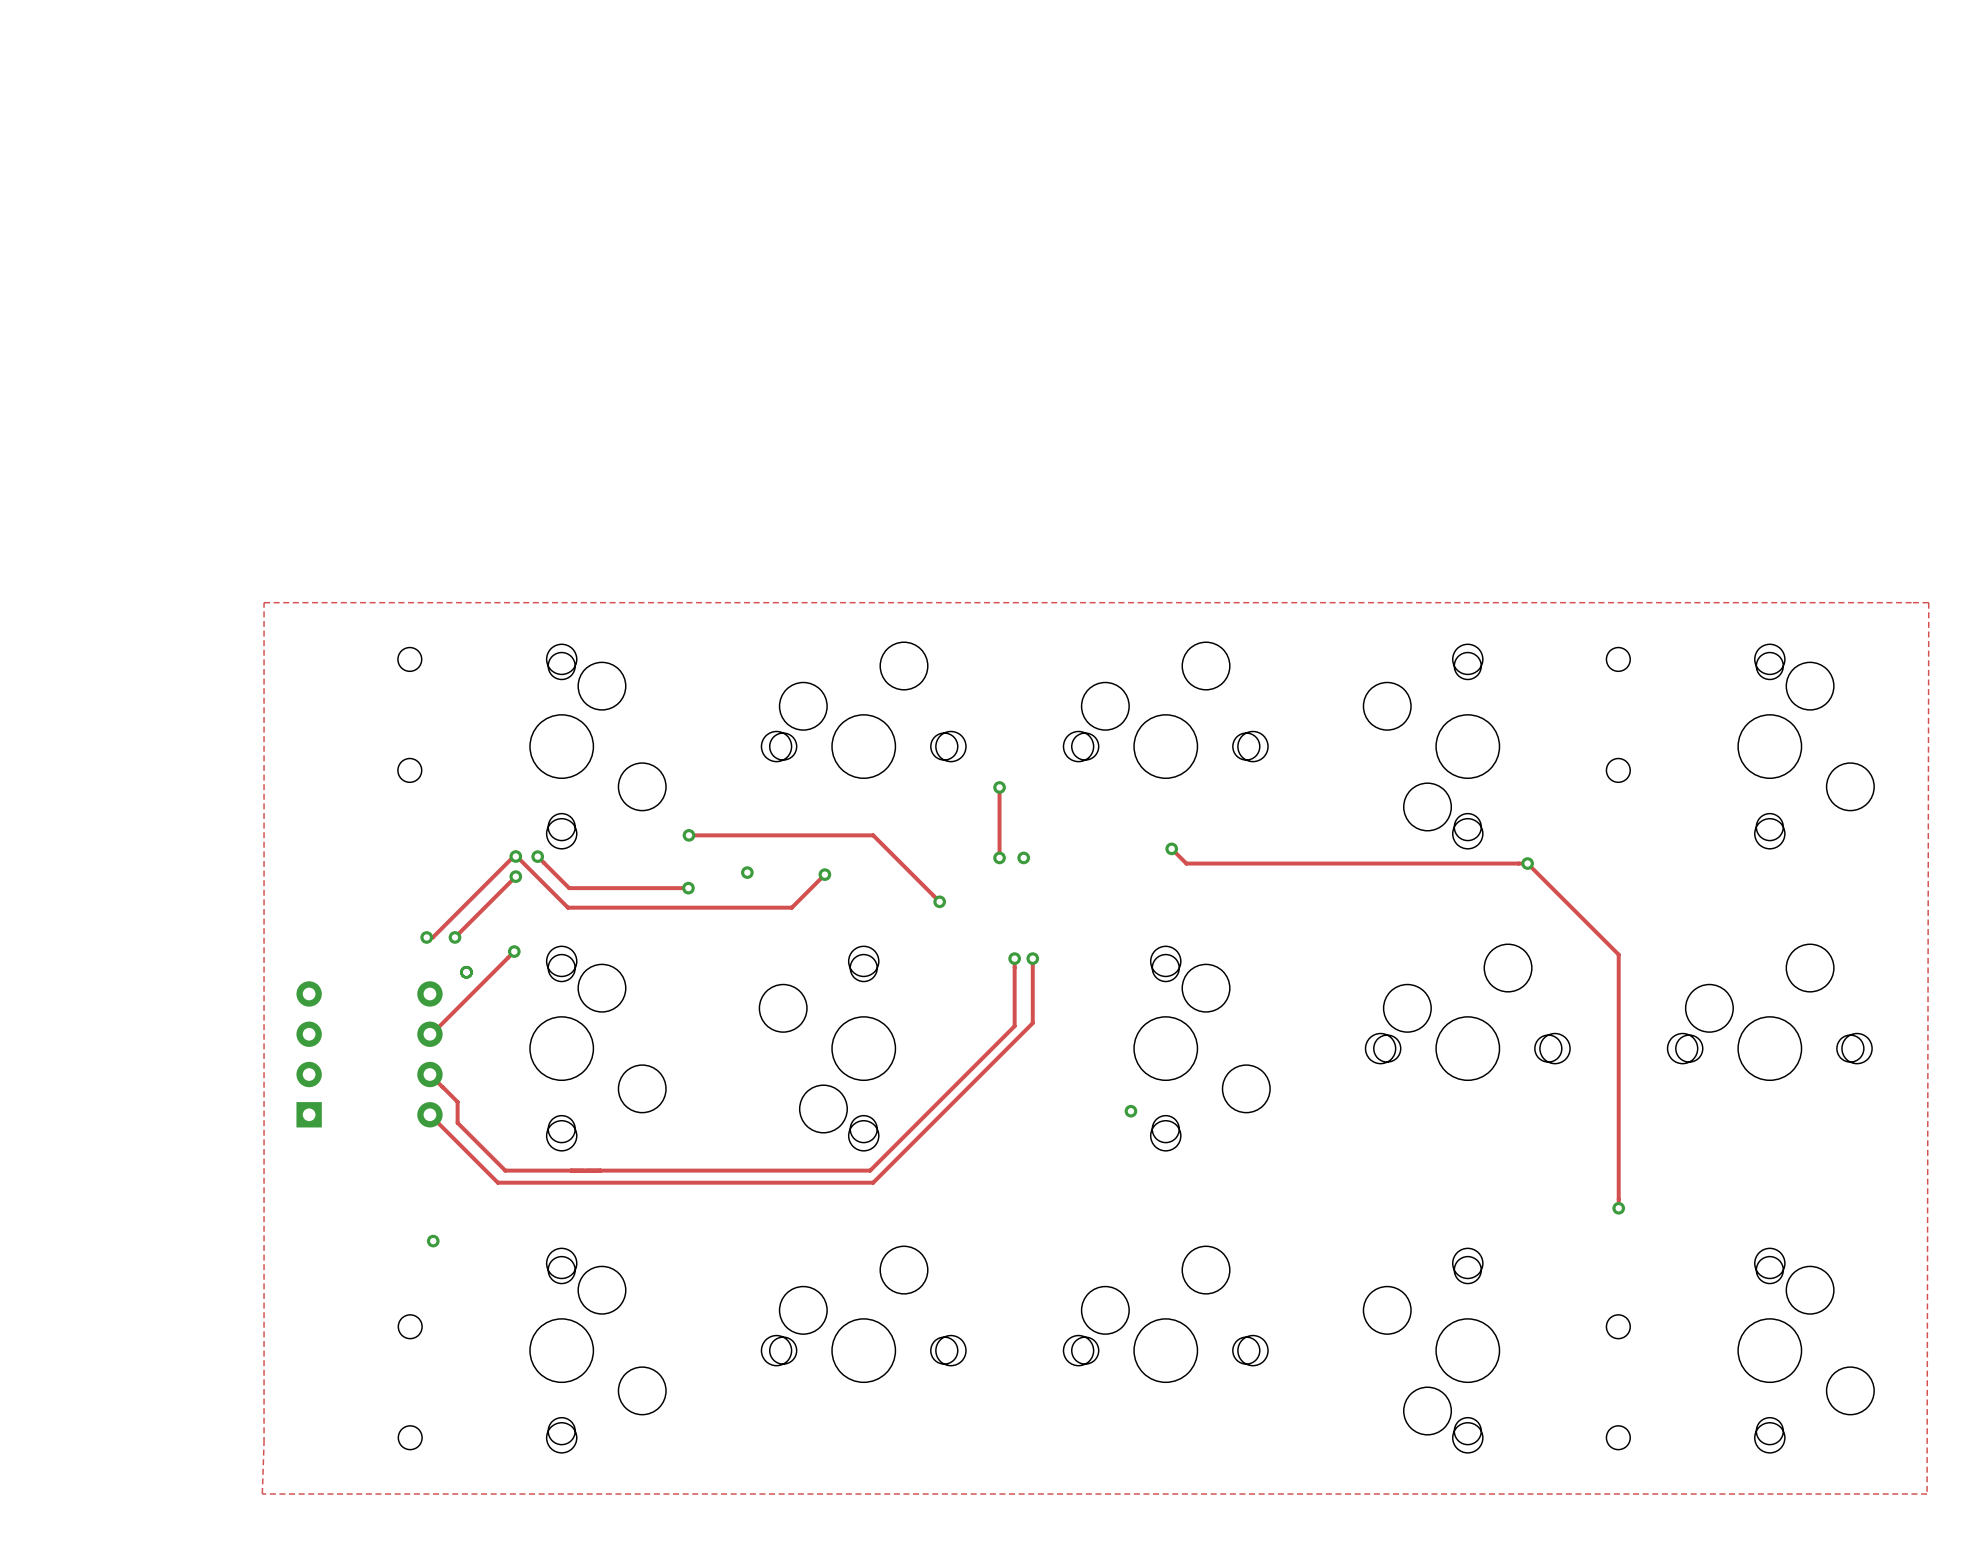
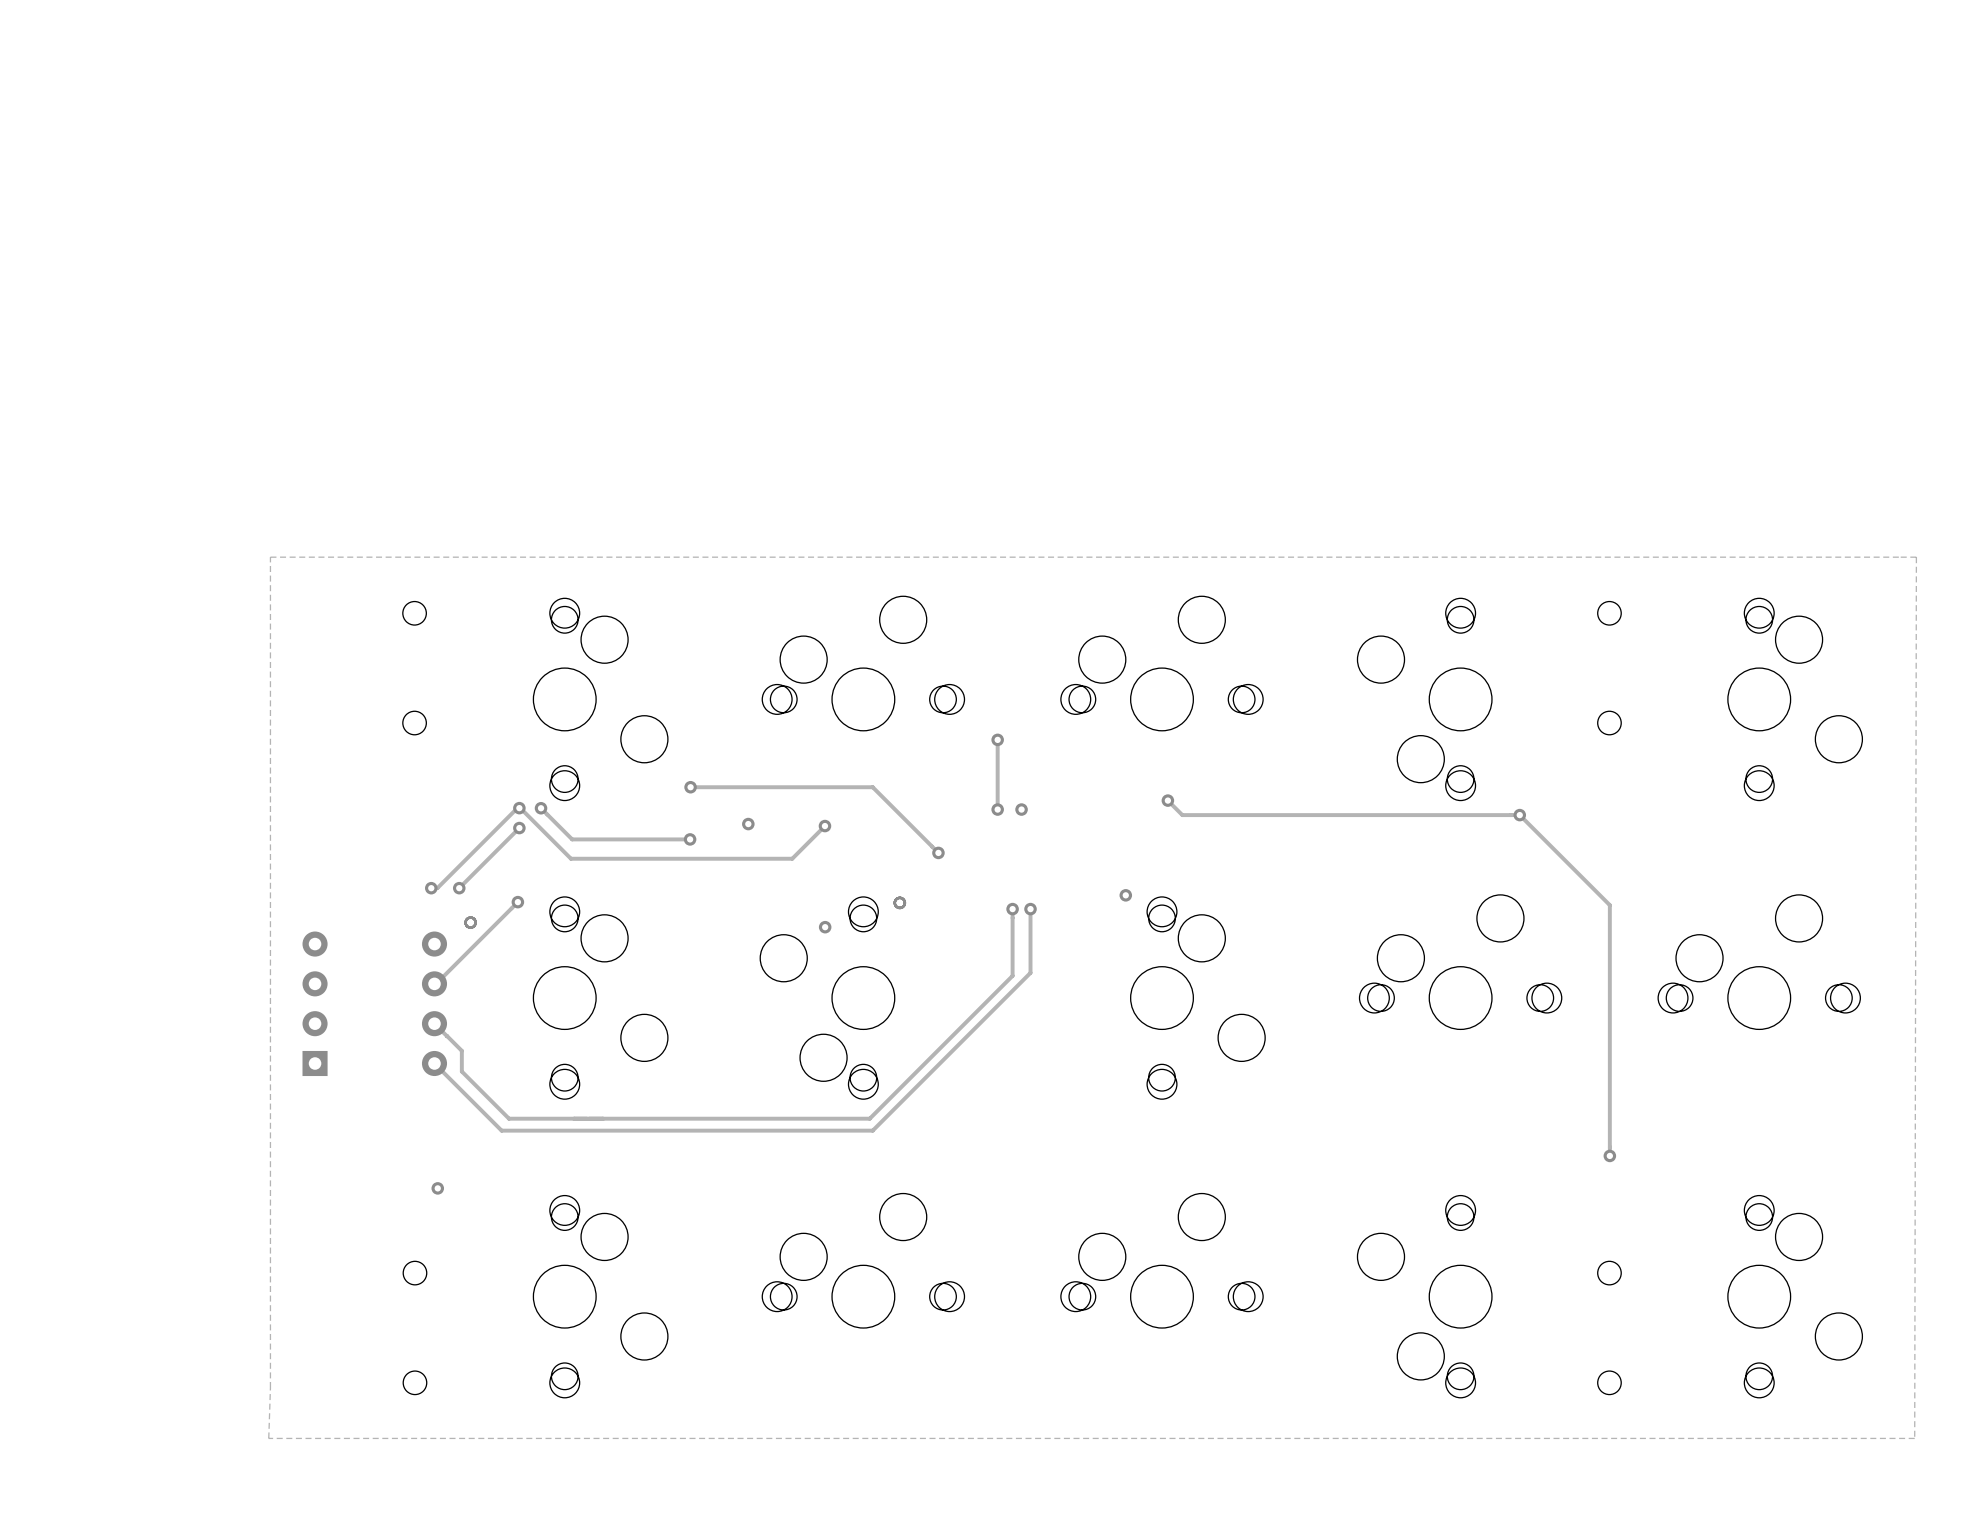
via: none -> (1125, 895)
via: none -> (899, 902)
via: none -> (825, 927)
via: (1130, 1111) -> none

